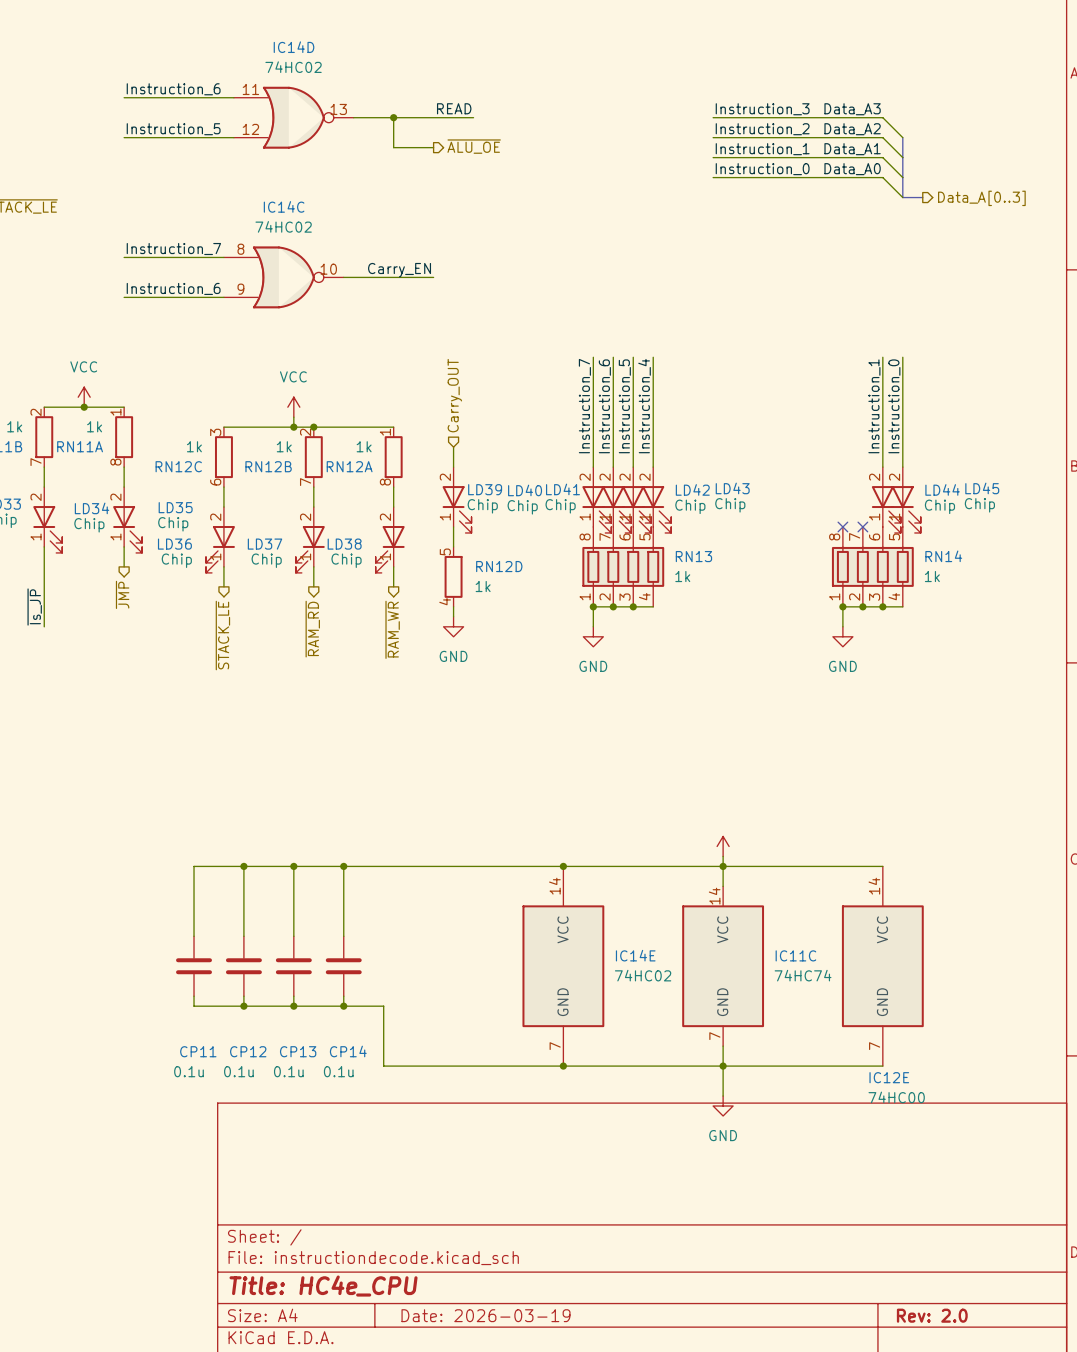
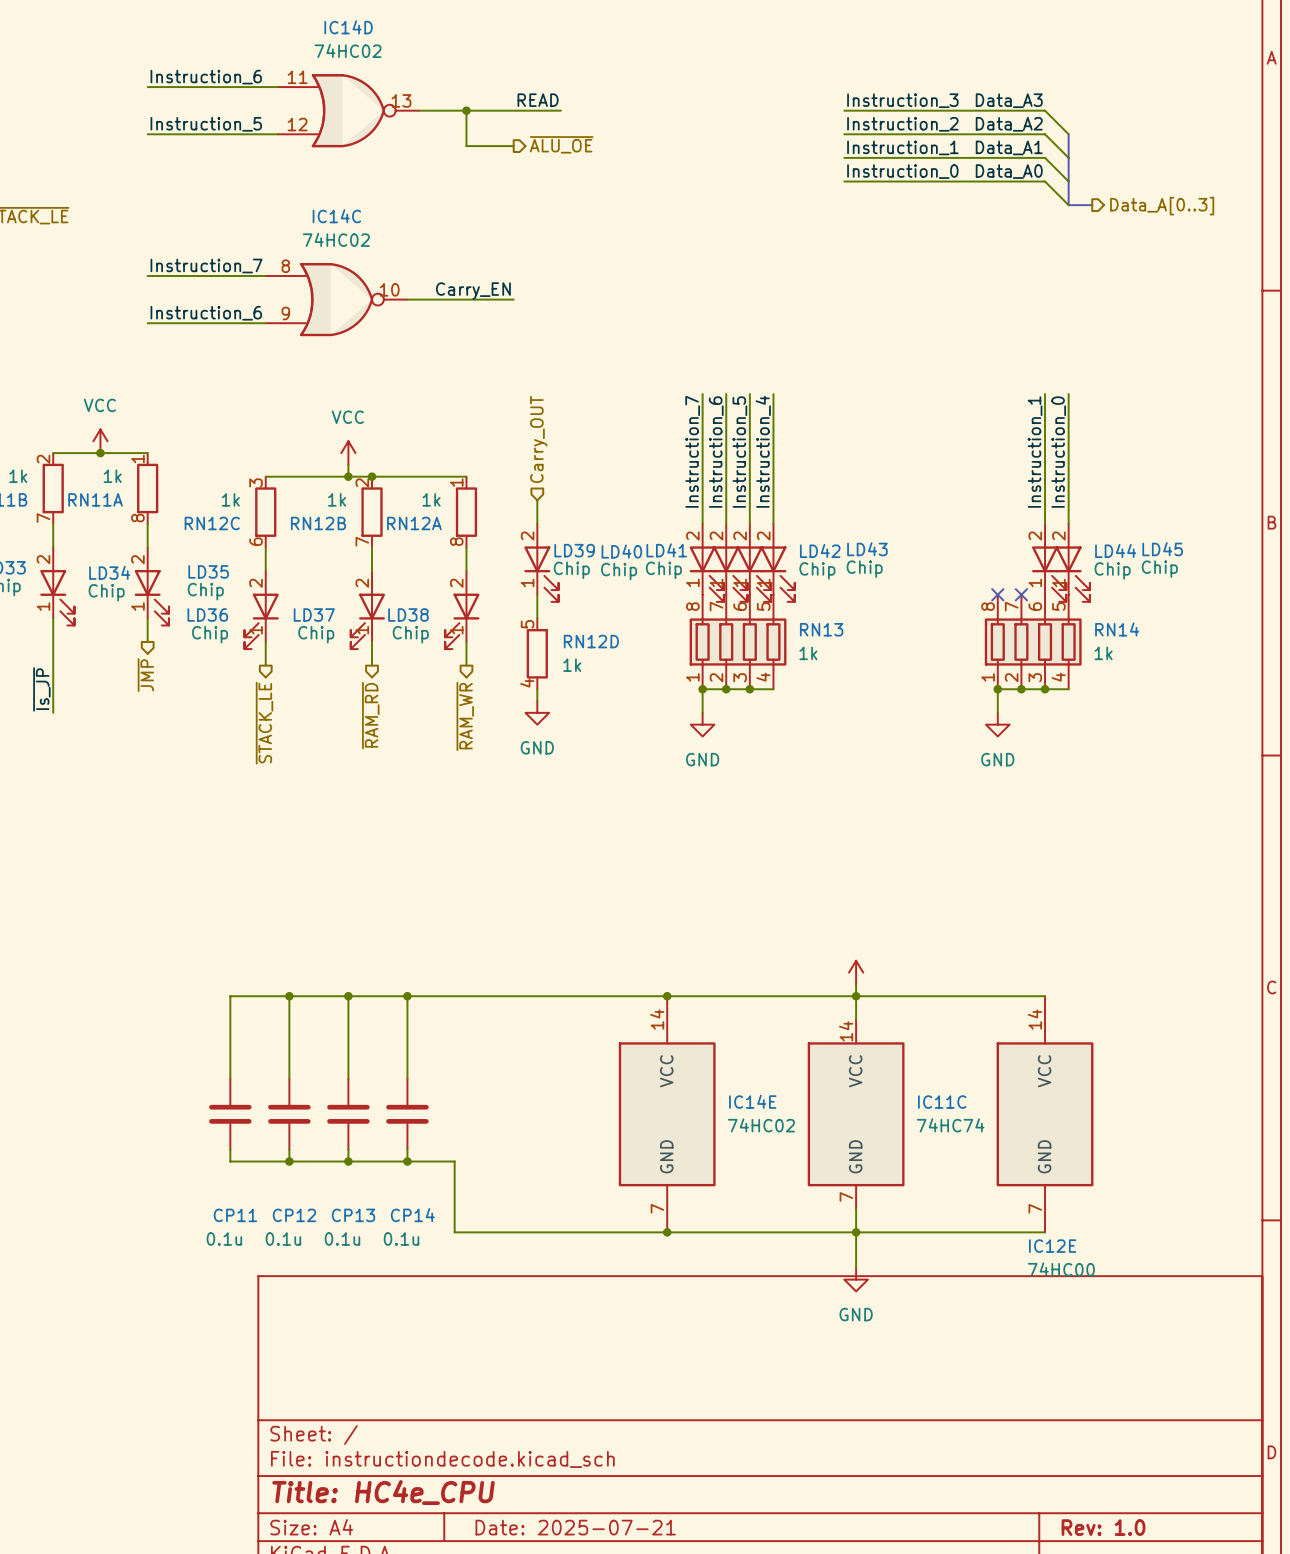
title block: Date: 2026-03-19 (486, 1315) -> Date: 2025-07-21 (575, 1527)
title block: Rev: 2.0 (932, 1315) -> Rev: 1.0 (1103, 1527)

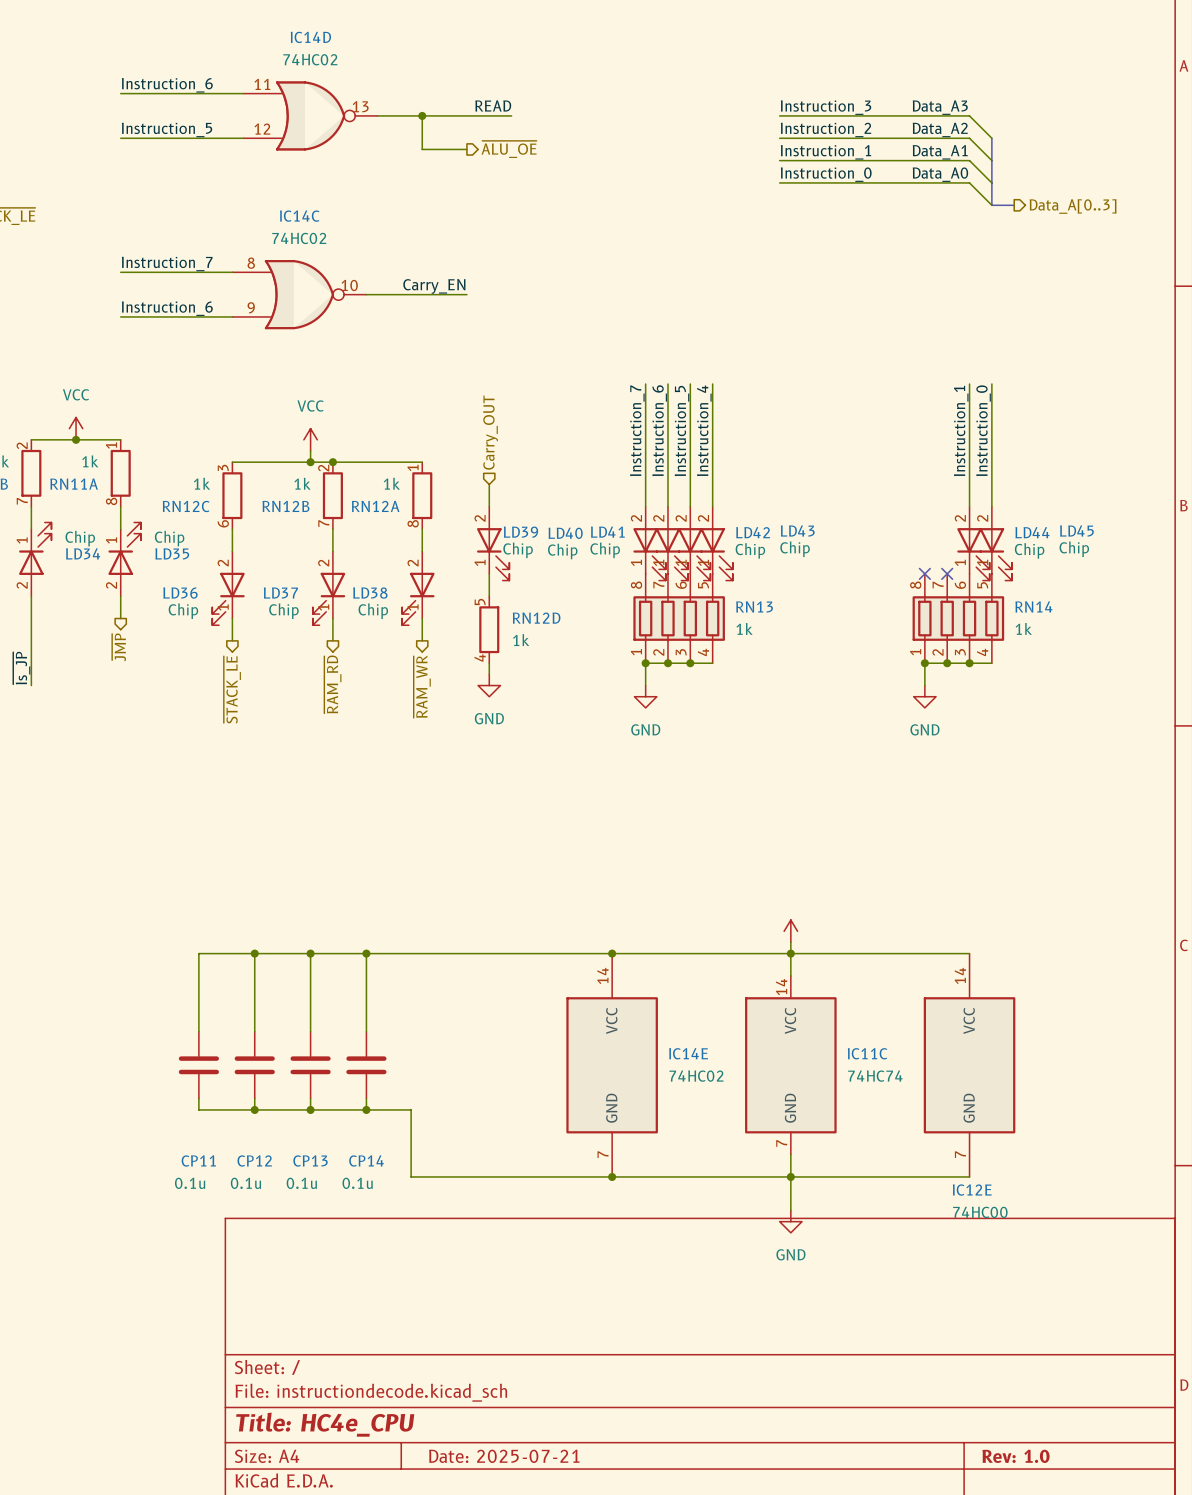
LD35 value position: Chip (205, 591) -> Chip (169, 538)
LD34 flip: as is (57, 597) -> up-down (35, 548)
LD35 flip: as is (151, 597) -> up-down (124, 548)

